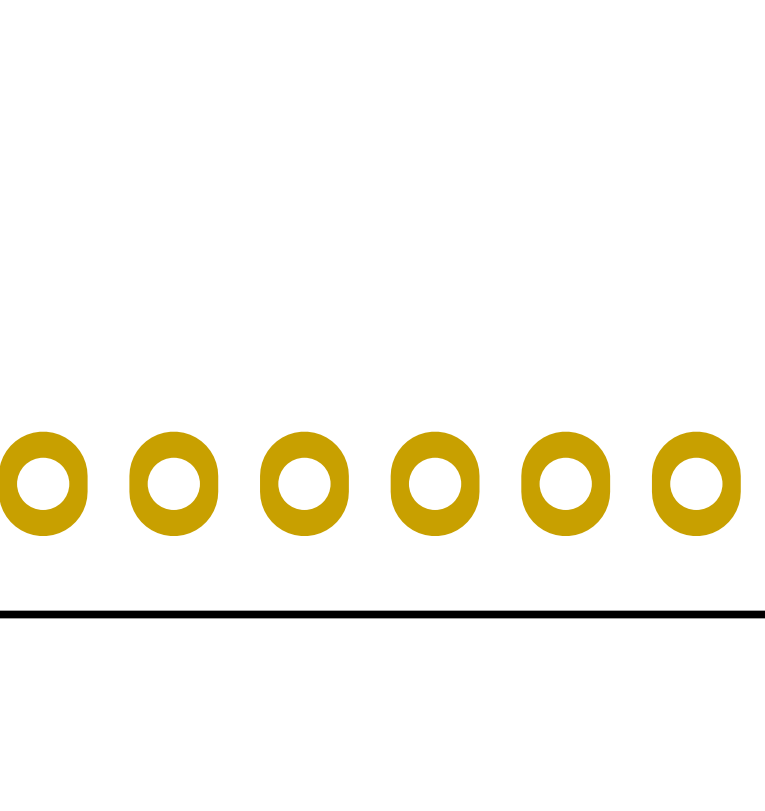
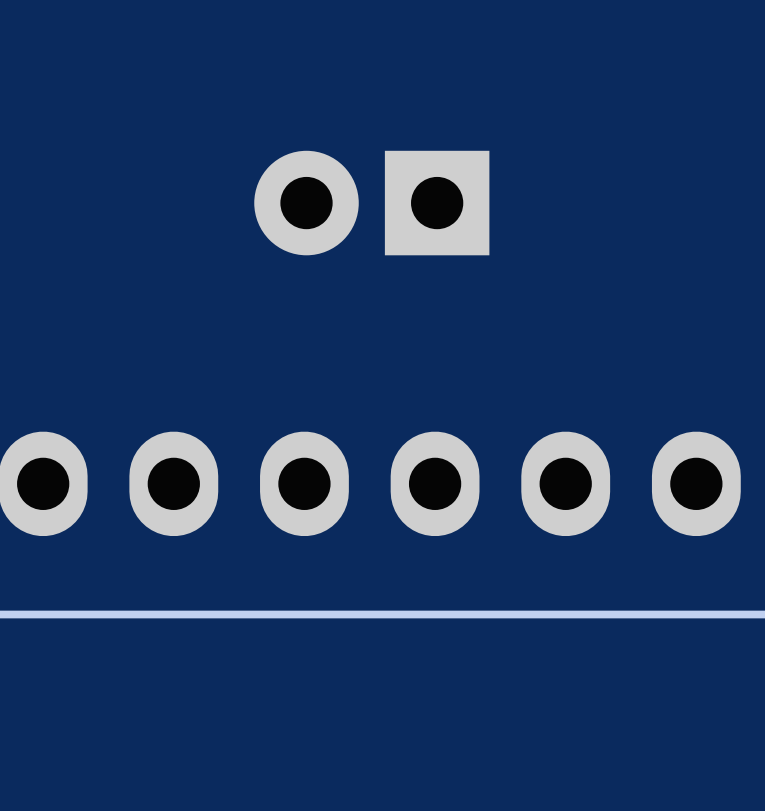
part: none -> (371, 203)

